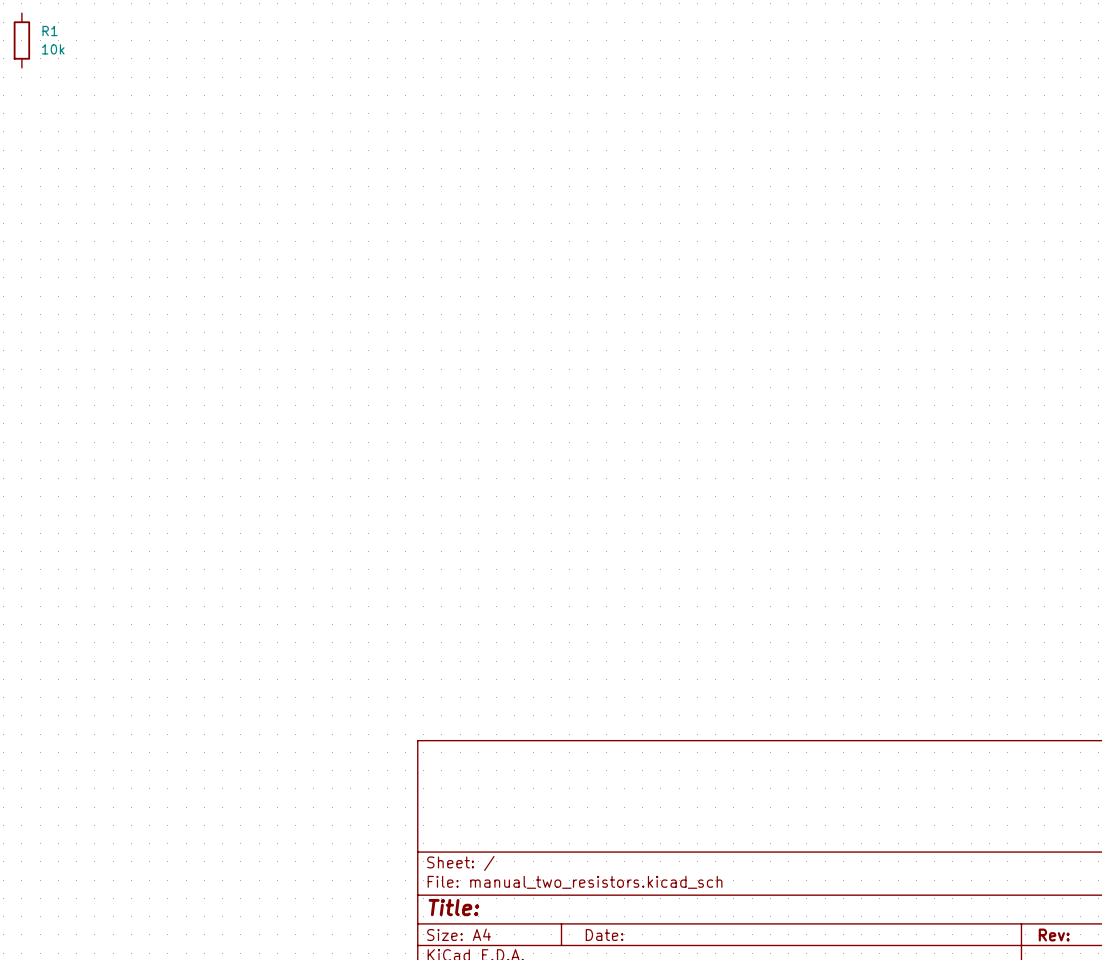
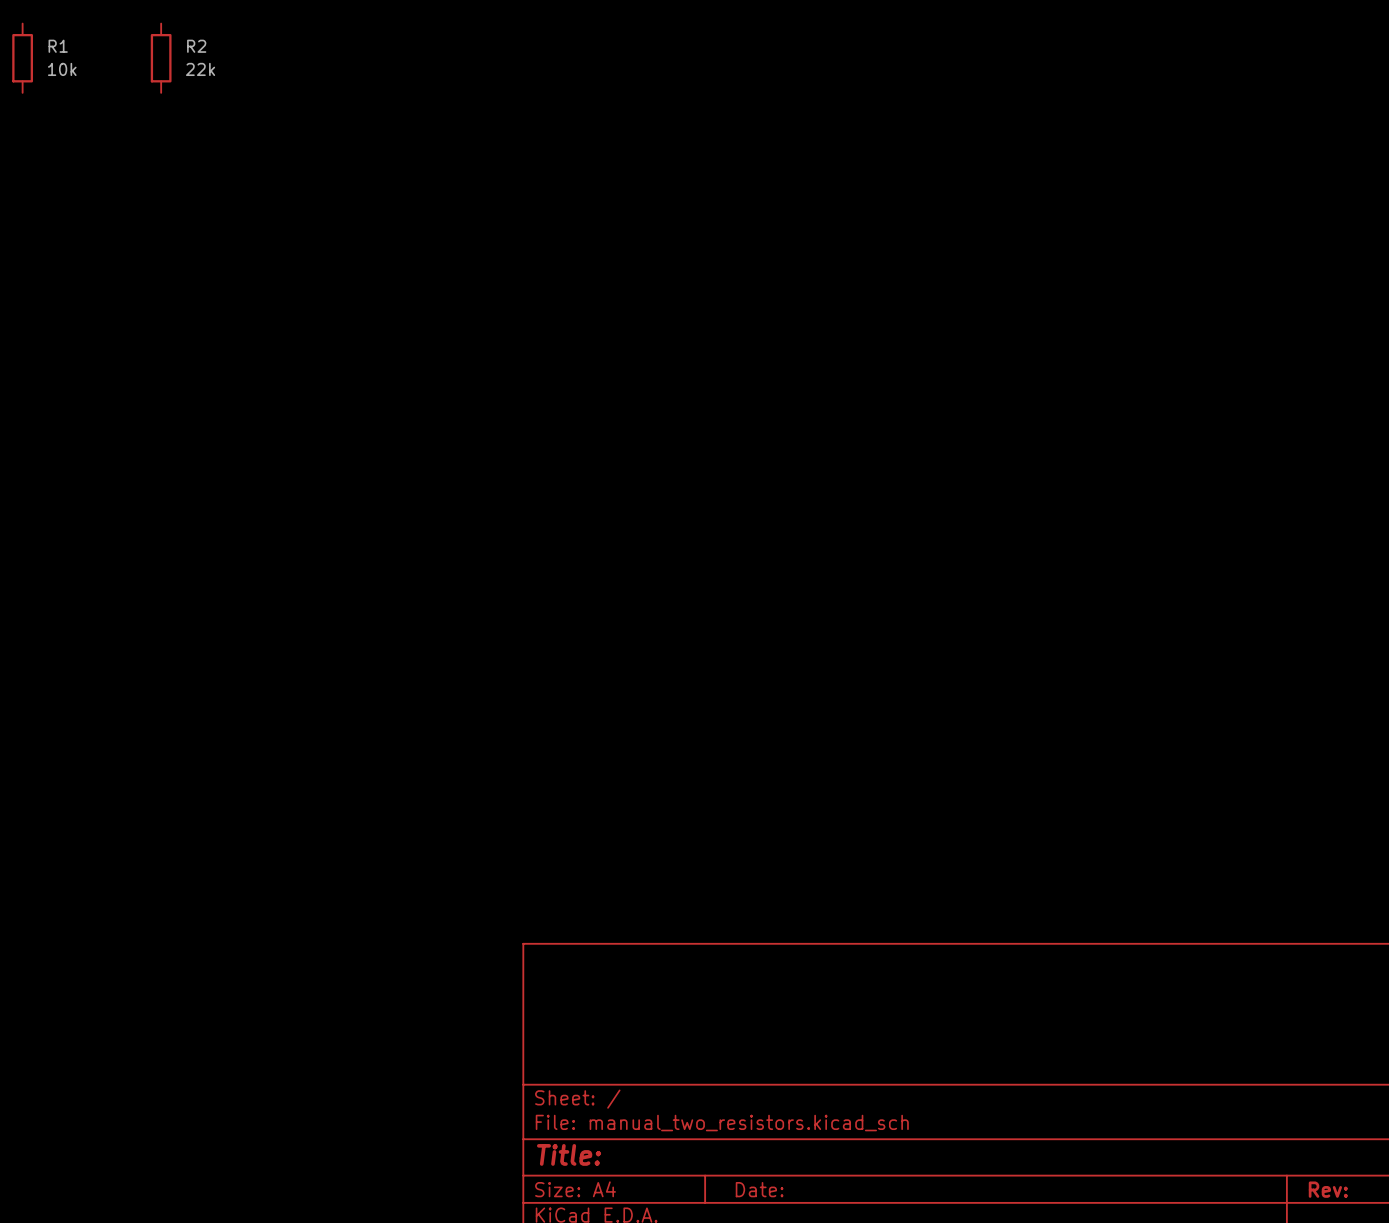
R2: none -> 22k (161, 58)

